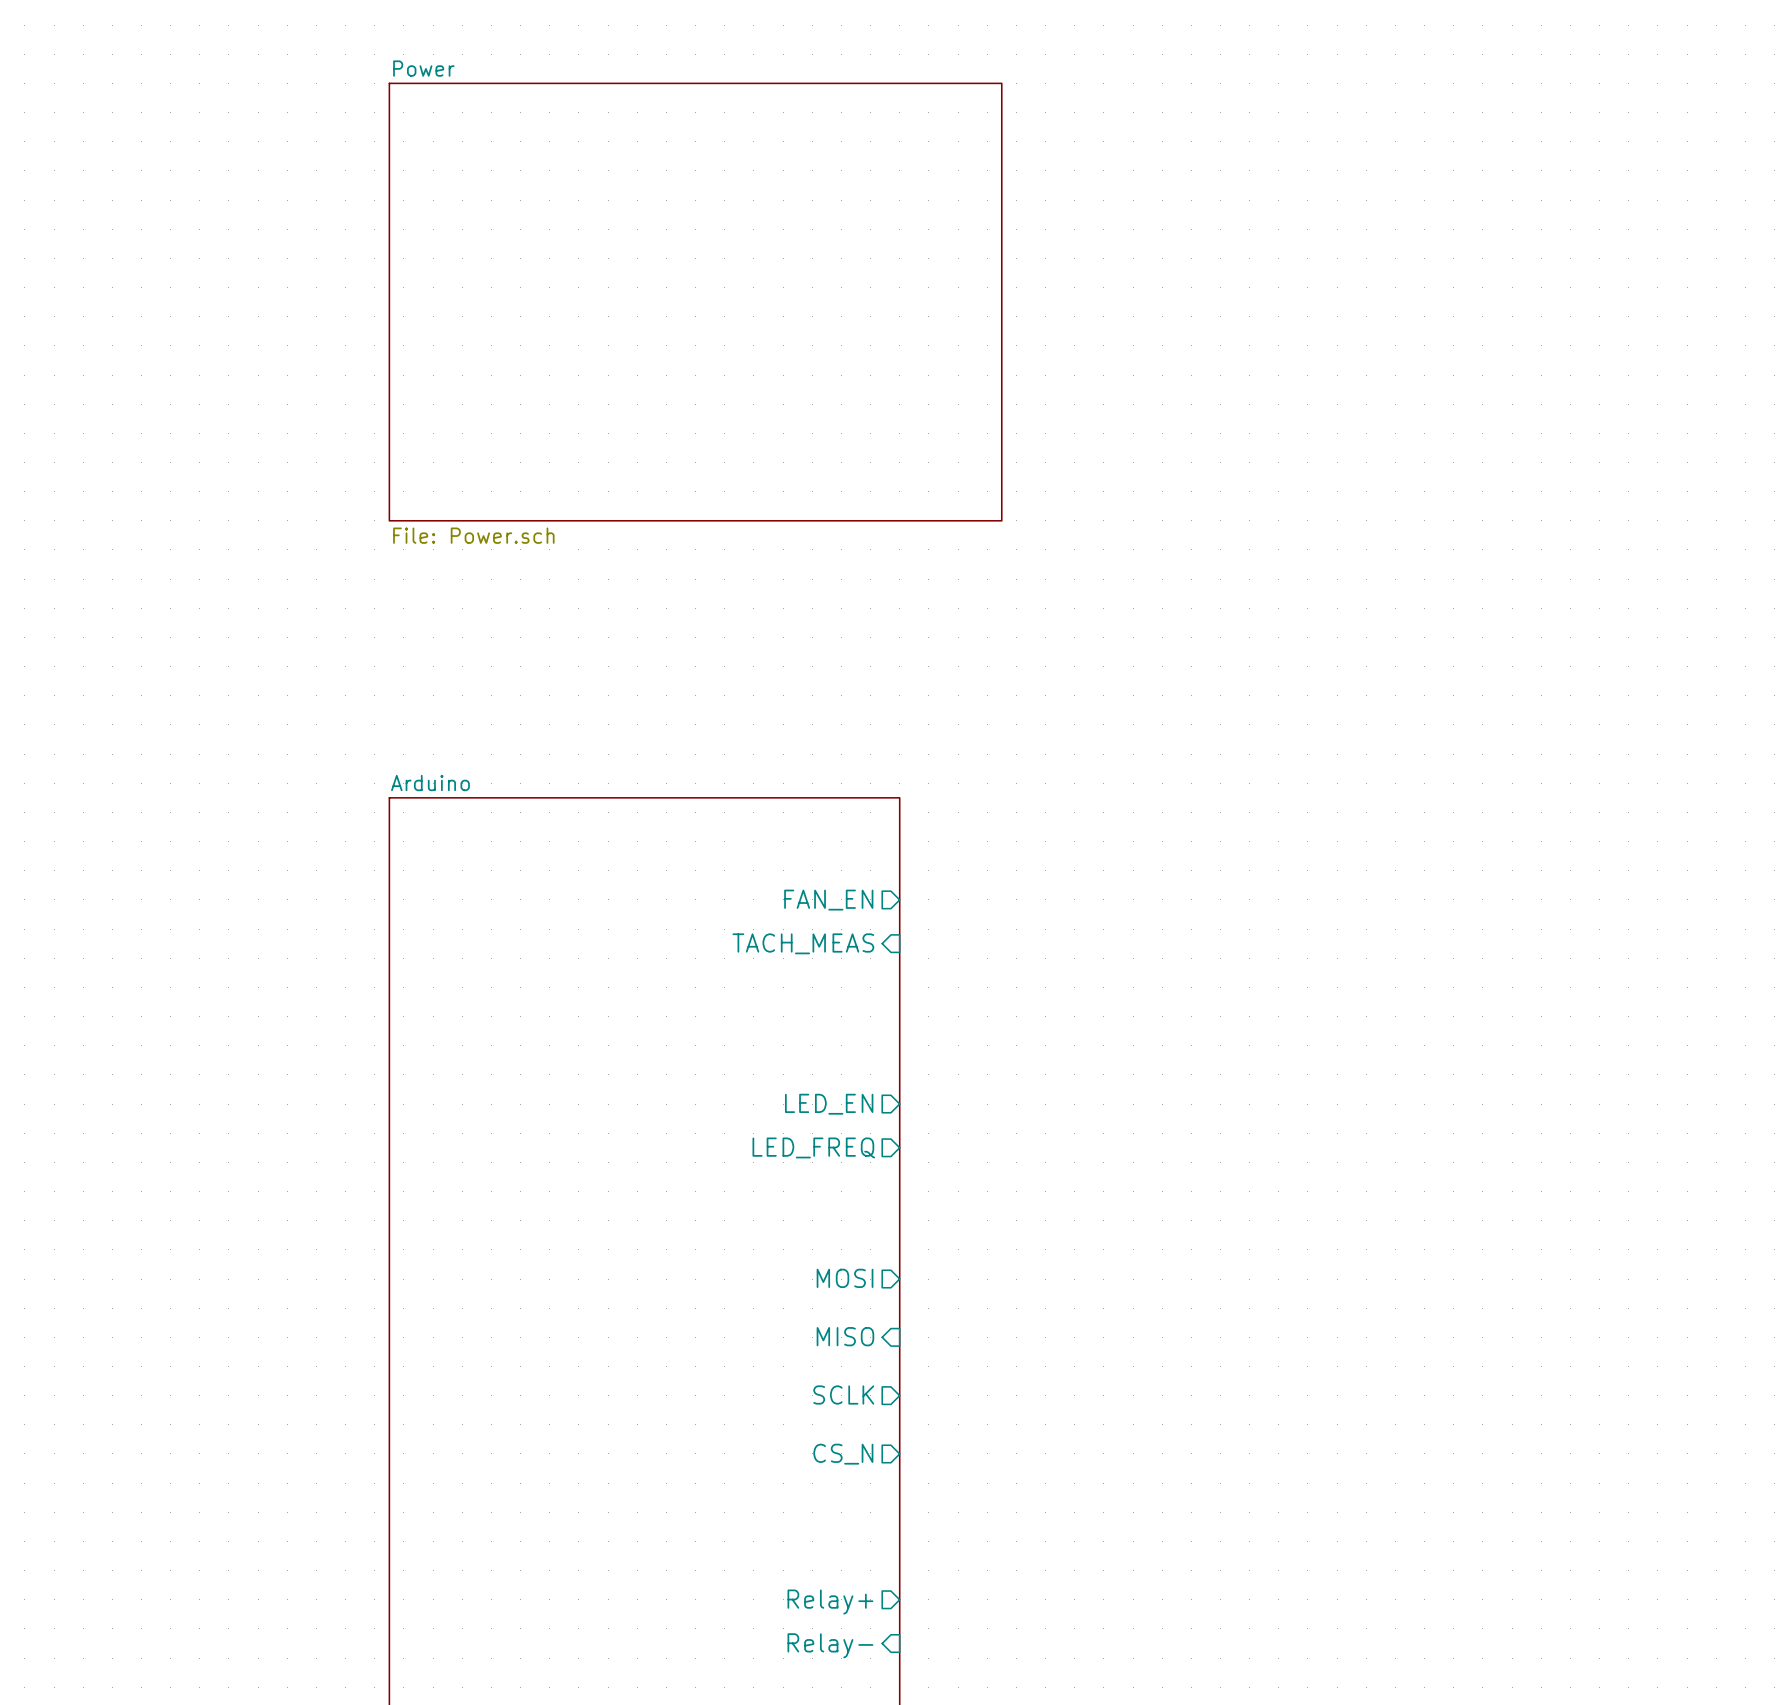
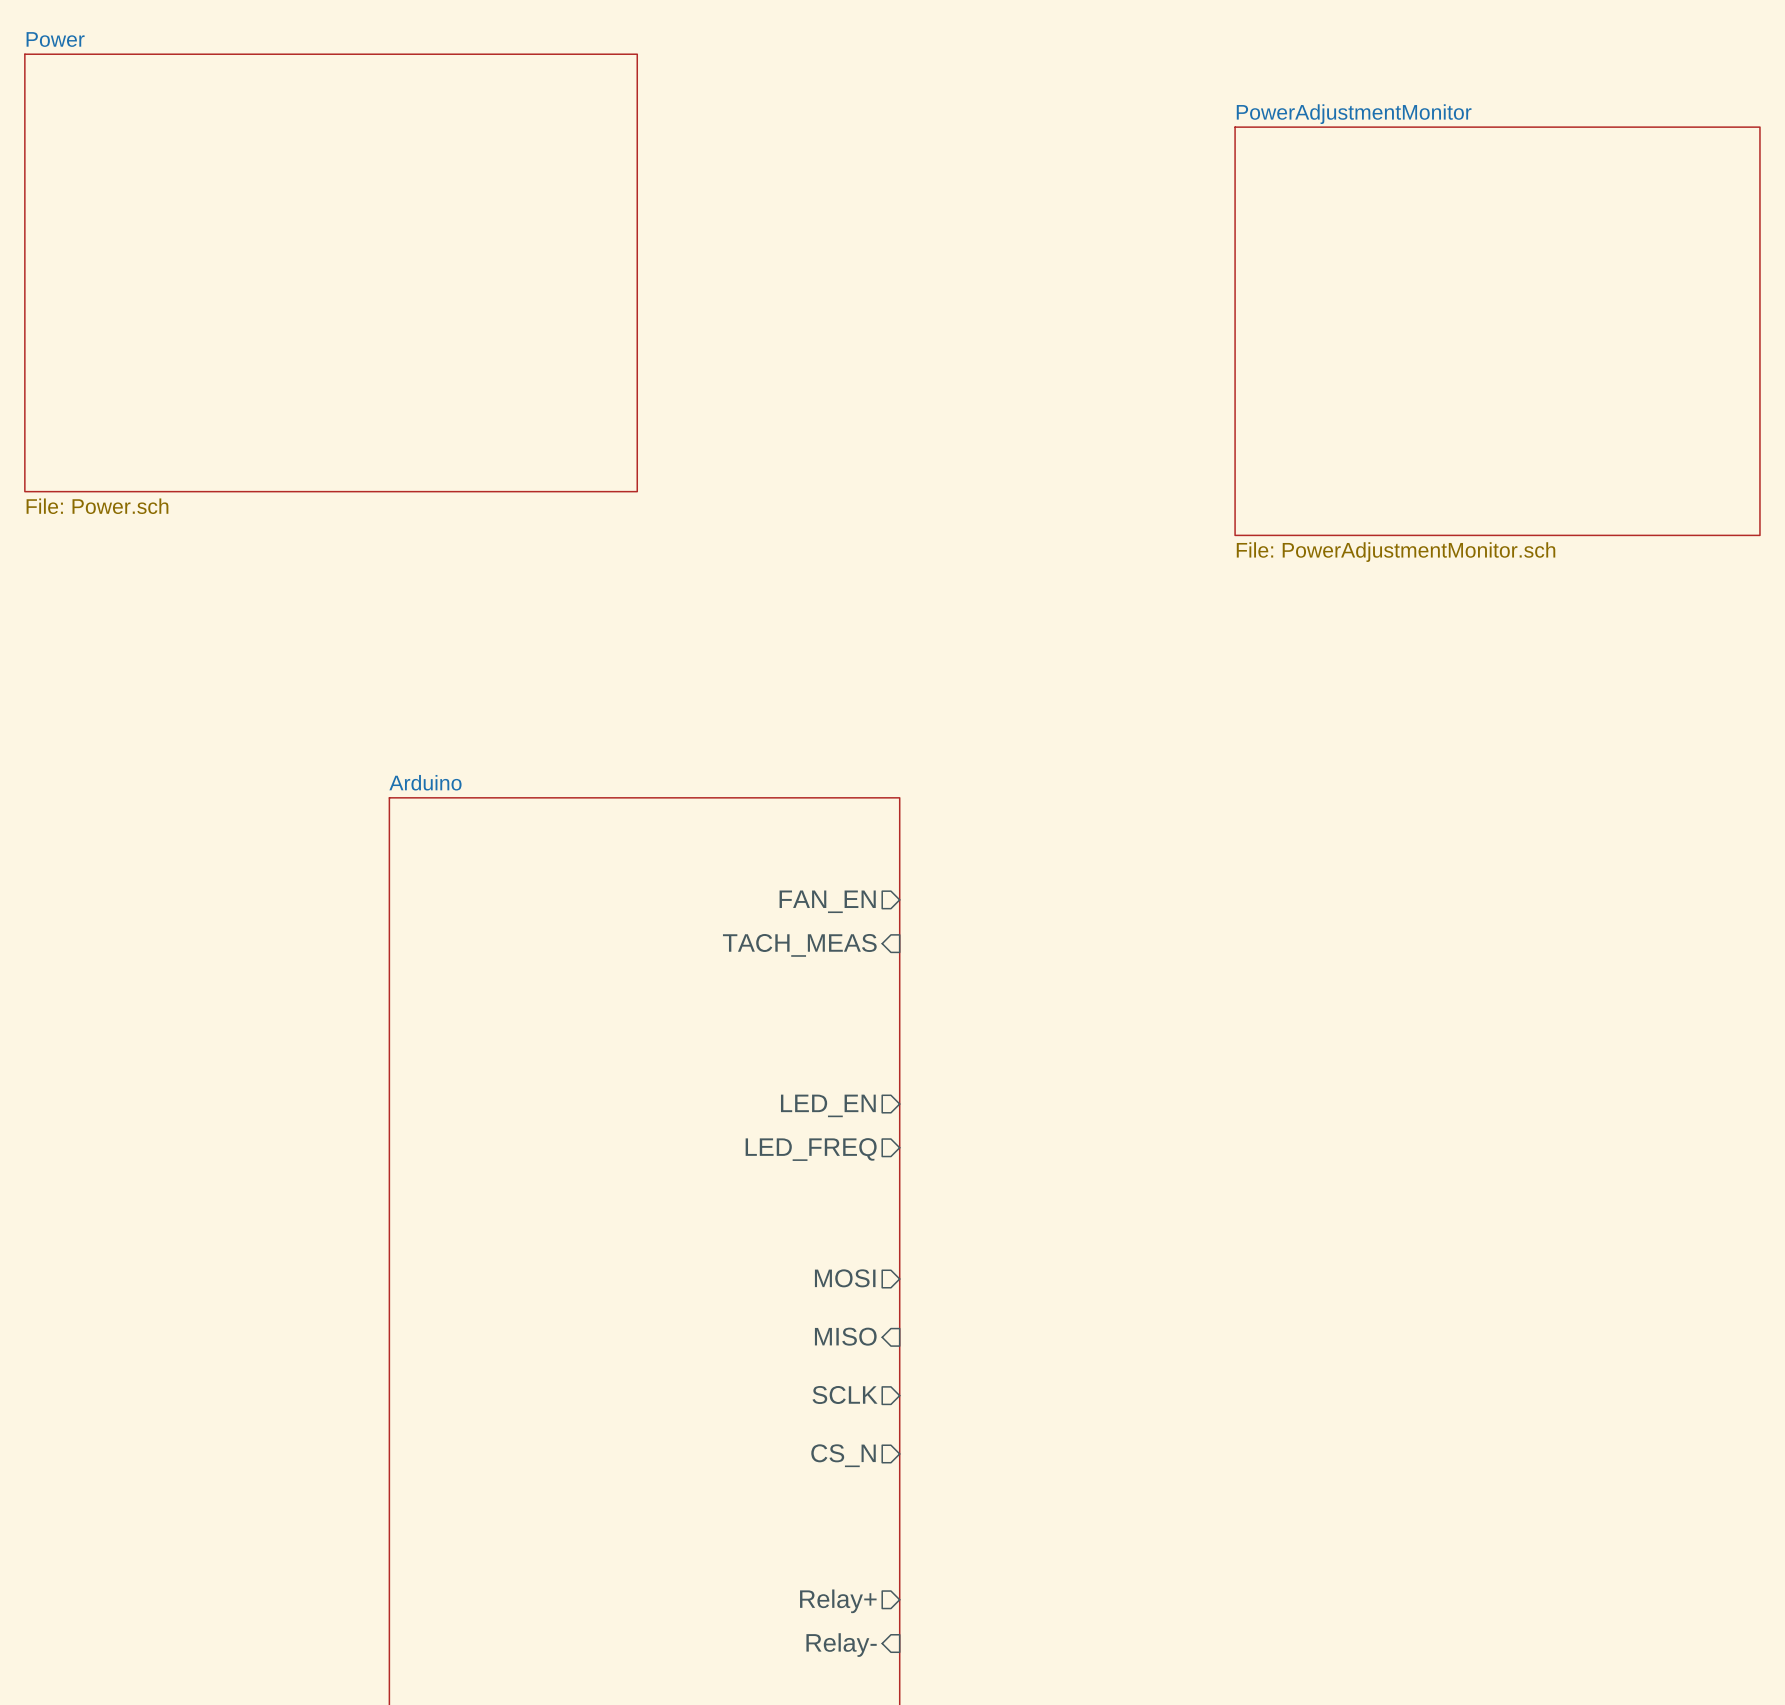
sheet Power: none -> File: Power.sch (331, 272)
sheet Power: File: Power.sch (695, 302) -> none
sheet PowerAdjustmentMonitor: none -> File: PowerAdjustmentMonitor.sch (1497, 331)

